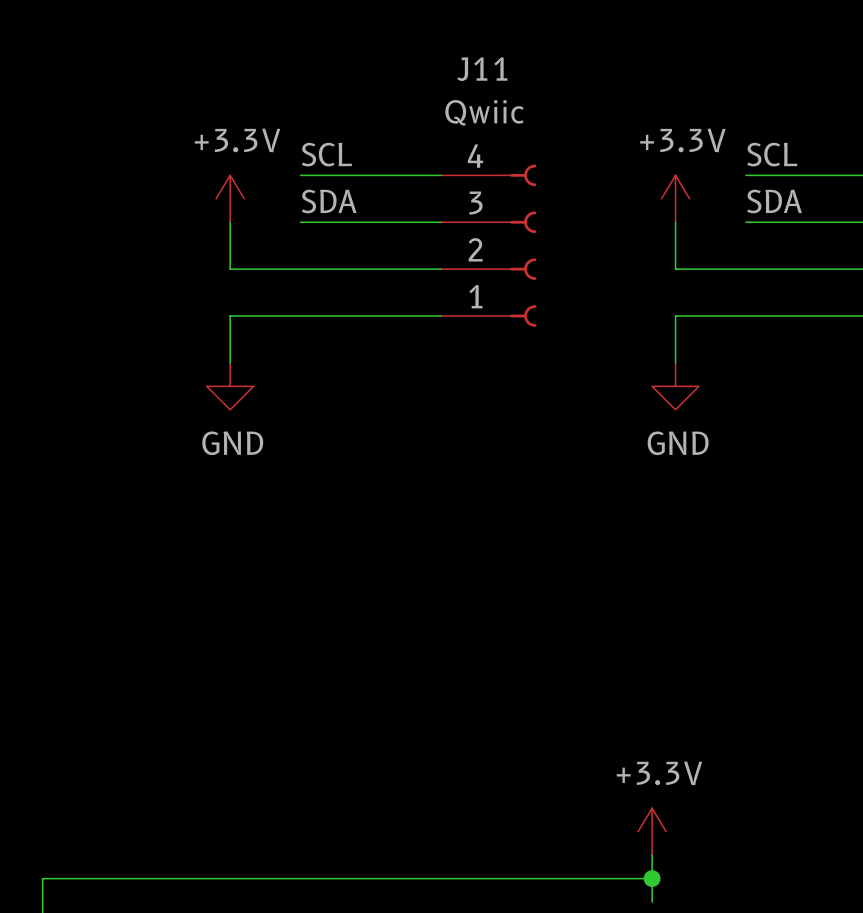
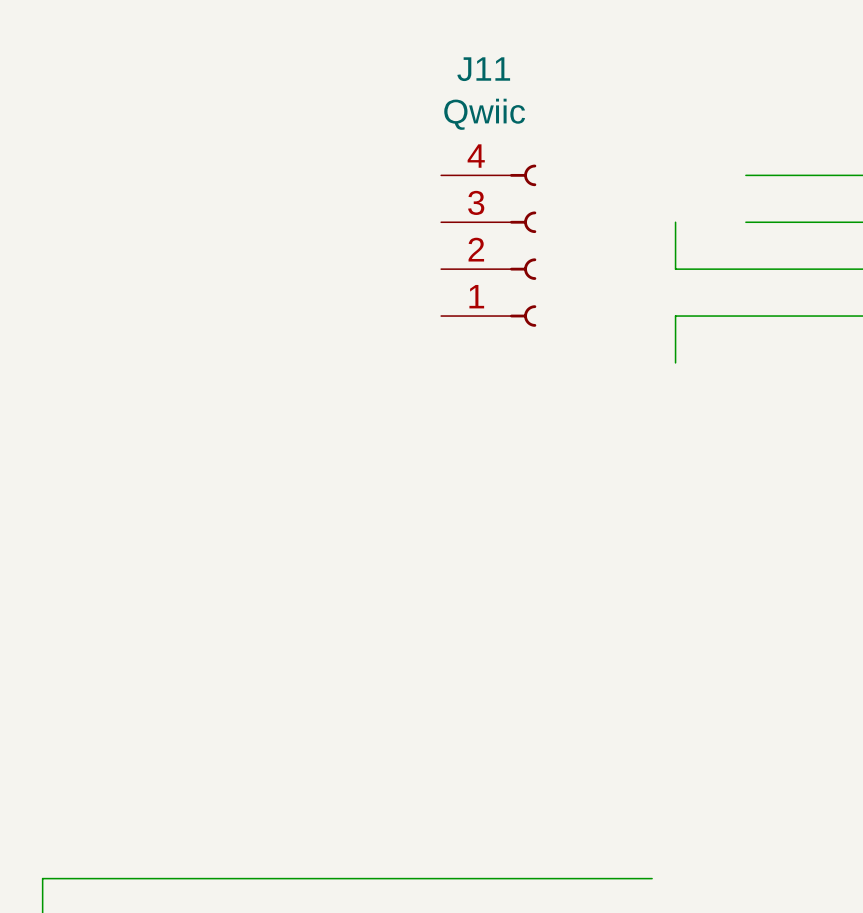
label: SCL (326, 154) -> none
label: SCL (772, 154) -> none
wire: (300, 175) (441, 175) -> none
power symbol: +3.3V (230, 198) -> none
power symbol: +3.3V (675, 198) -> none
label: SDA (329, 201) -> none
label: SDA (774, 201) -> none
wire: (230, 222) (230, 269) (441, 269) -> none
wire: (300, 222) (441, 222) -> none
wire: (441, 316) (230, 316) (230, 362) -> none
power symbol: GND (230, 386) -> none
power symbol: GND (675, 386) -> none
power symbol: +3.3V (652, 831) -> none
wire: (652, 855) (652, 902) -> none
junction: (652, 878) -> none

